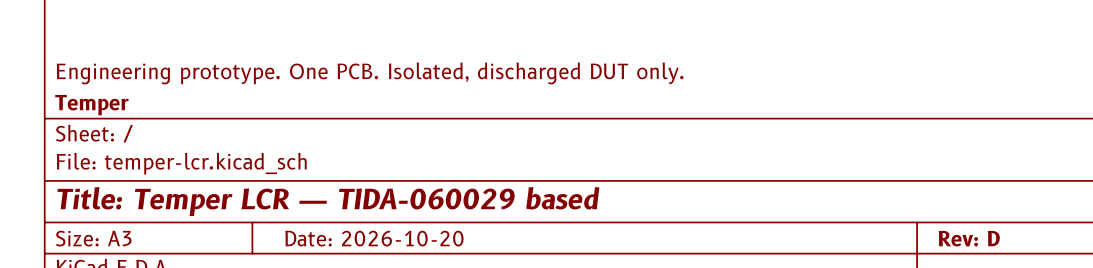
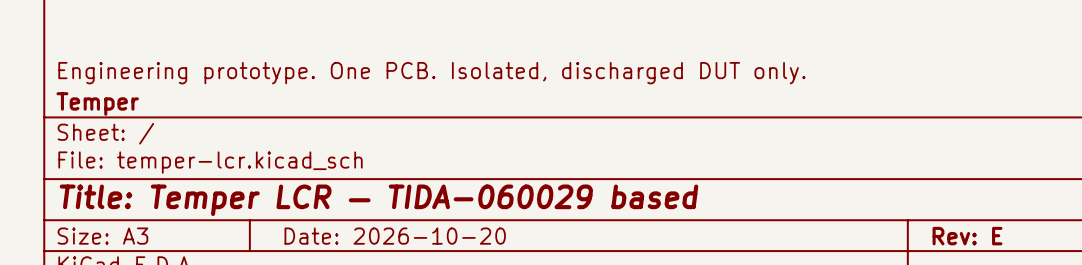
title block: Rev: D (969, 238) -> Rev: E (967, 236)

